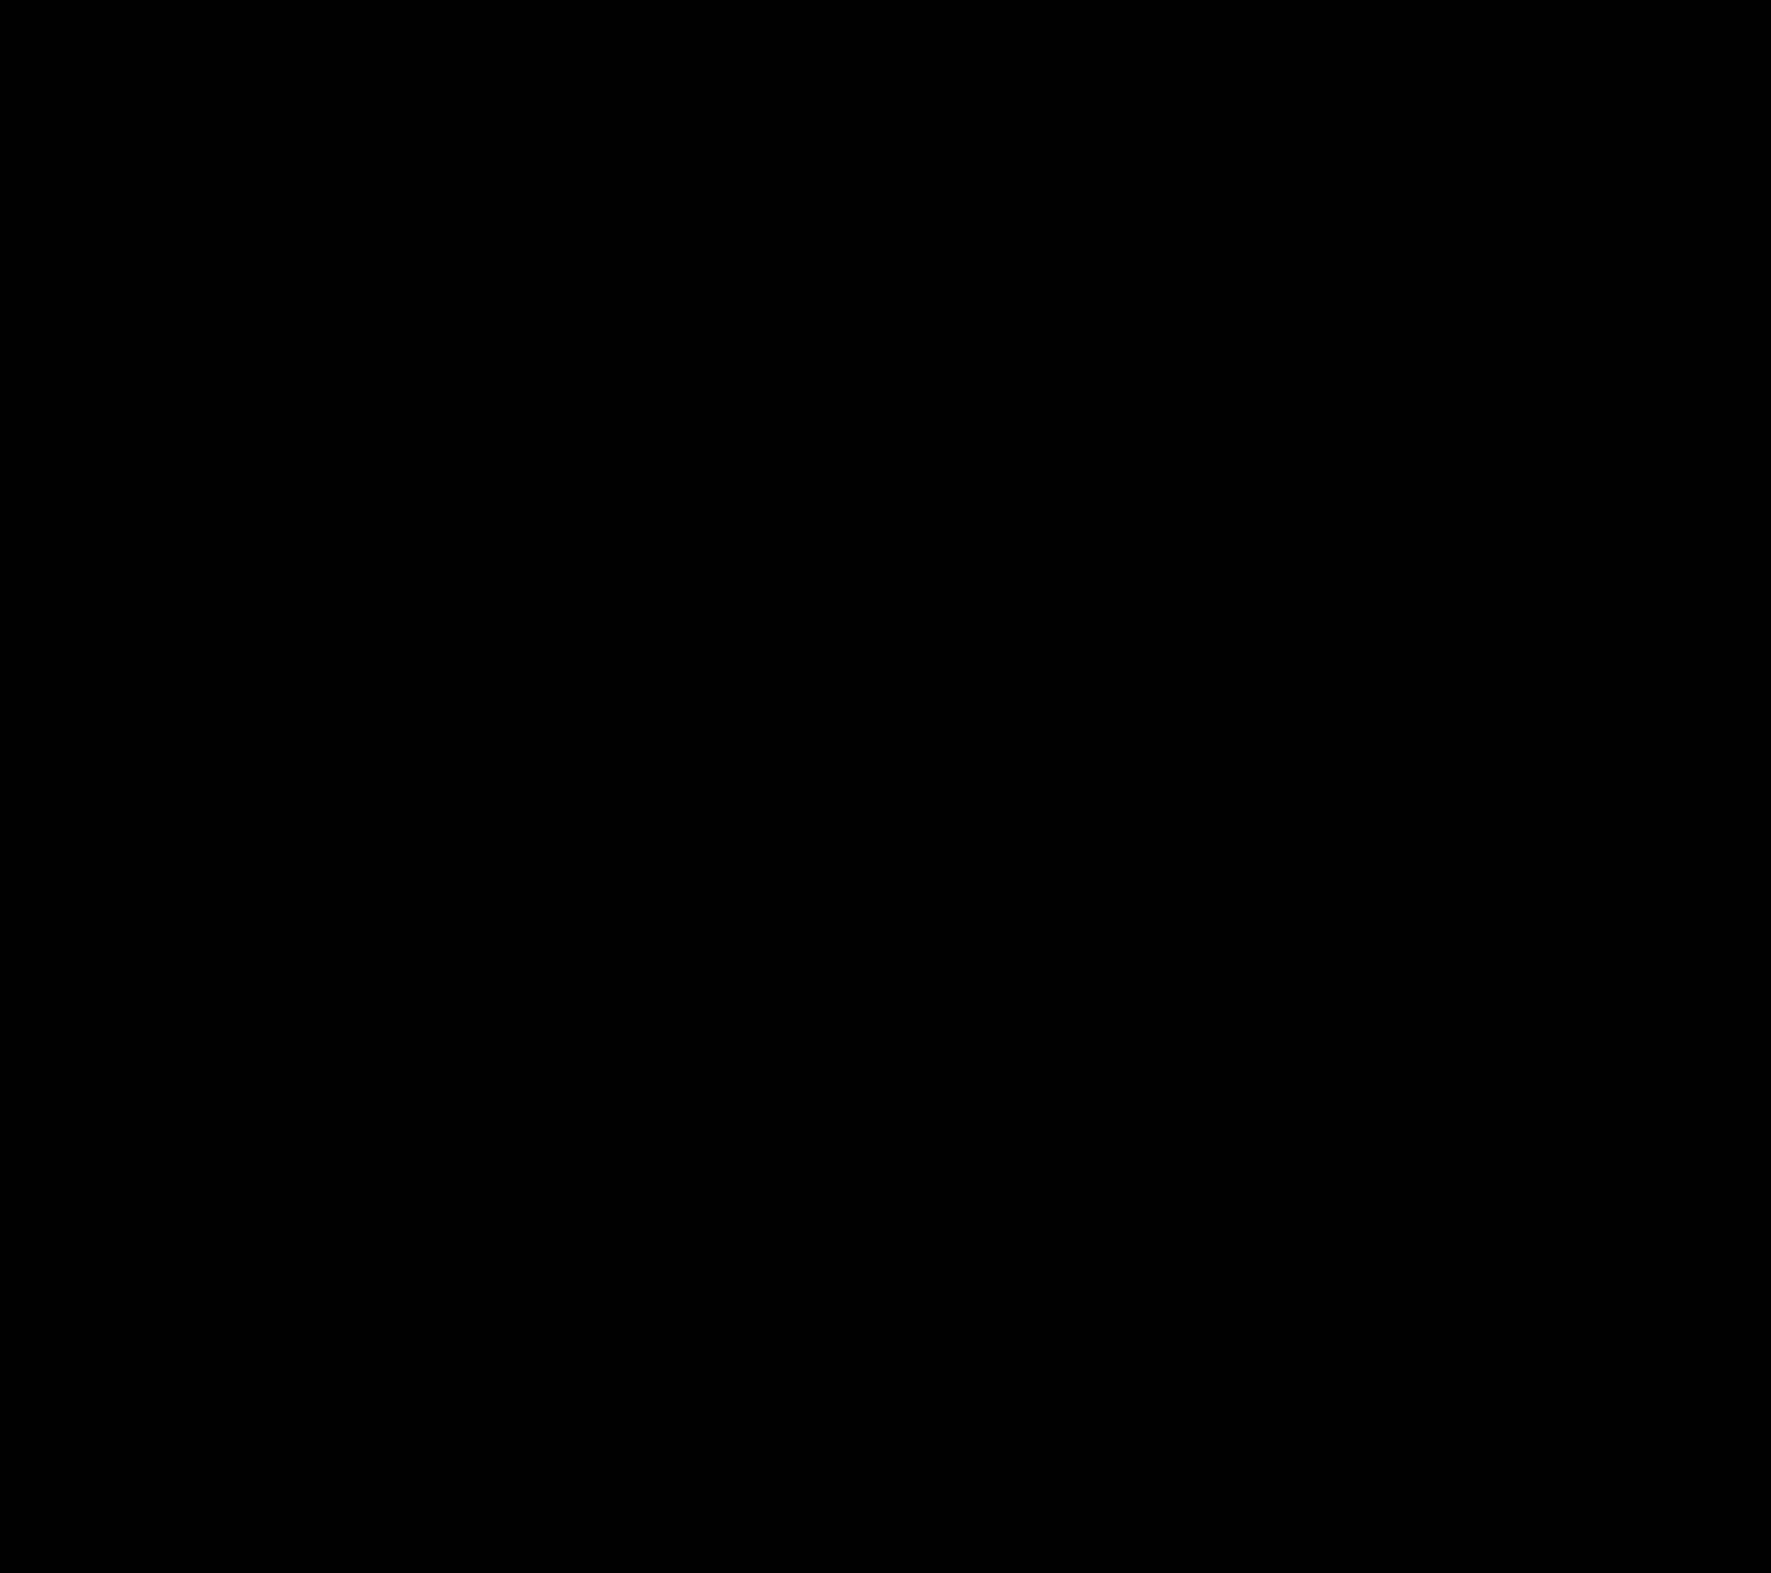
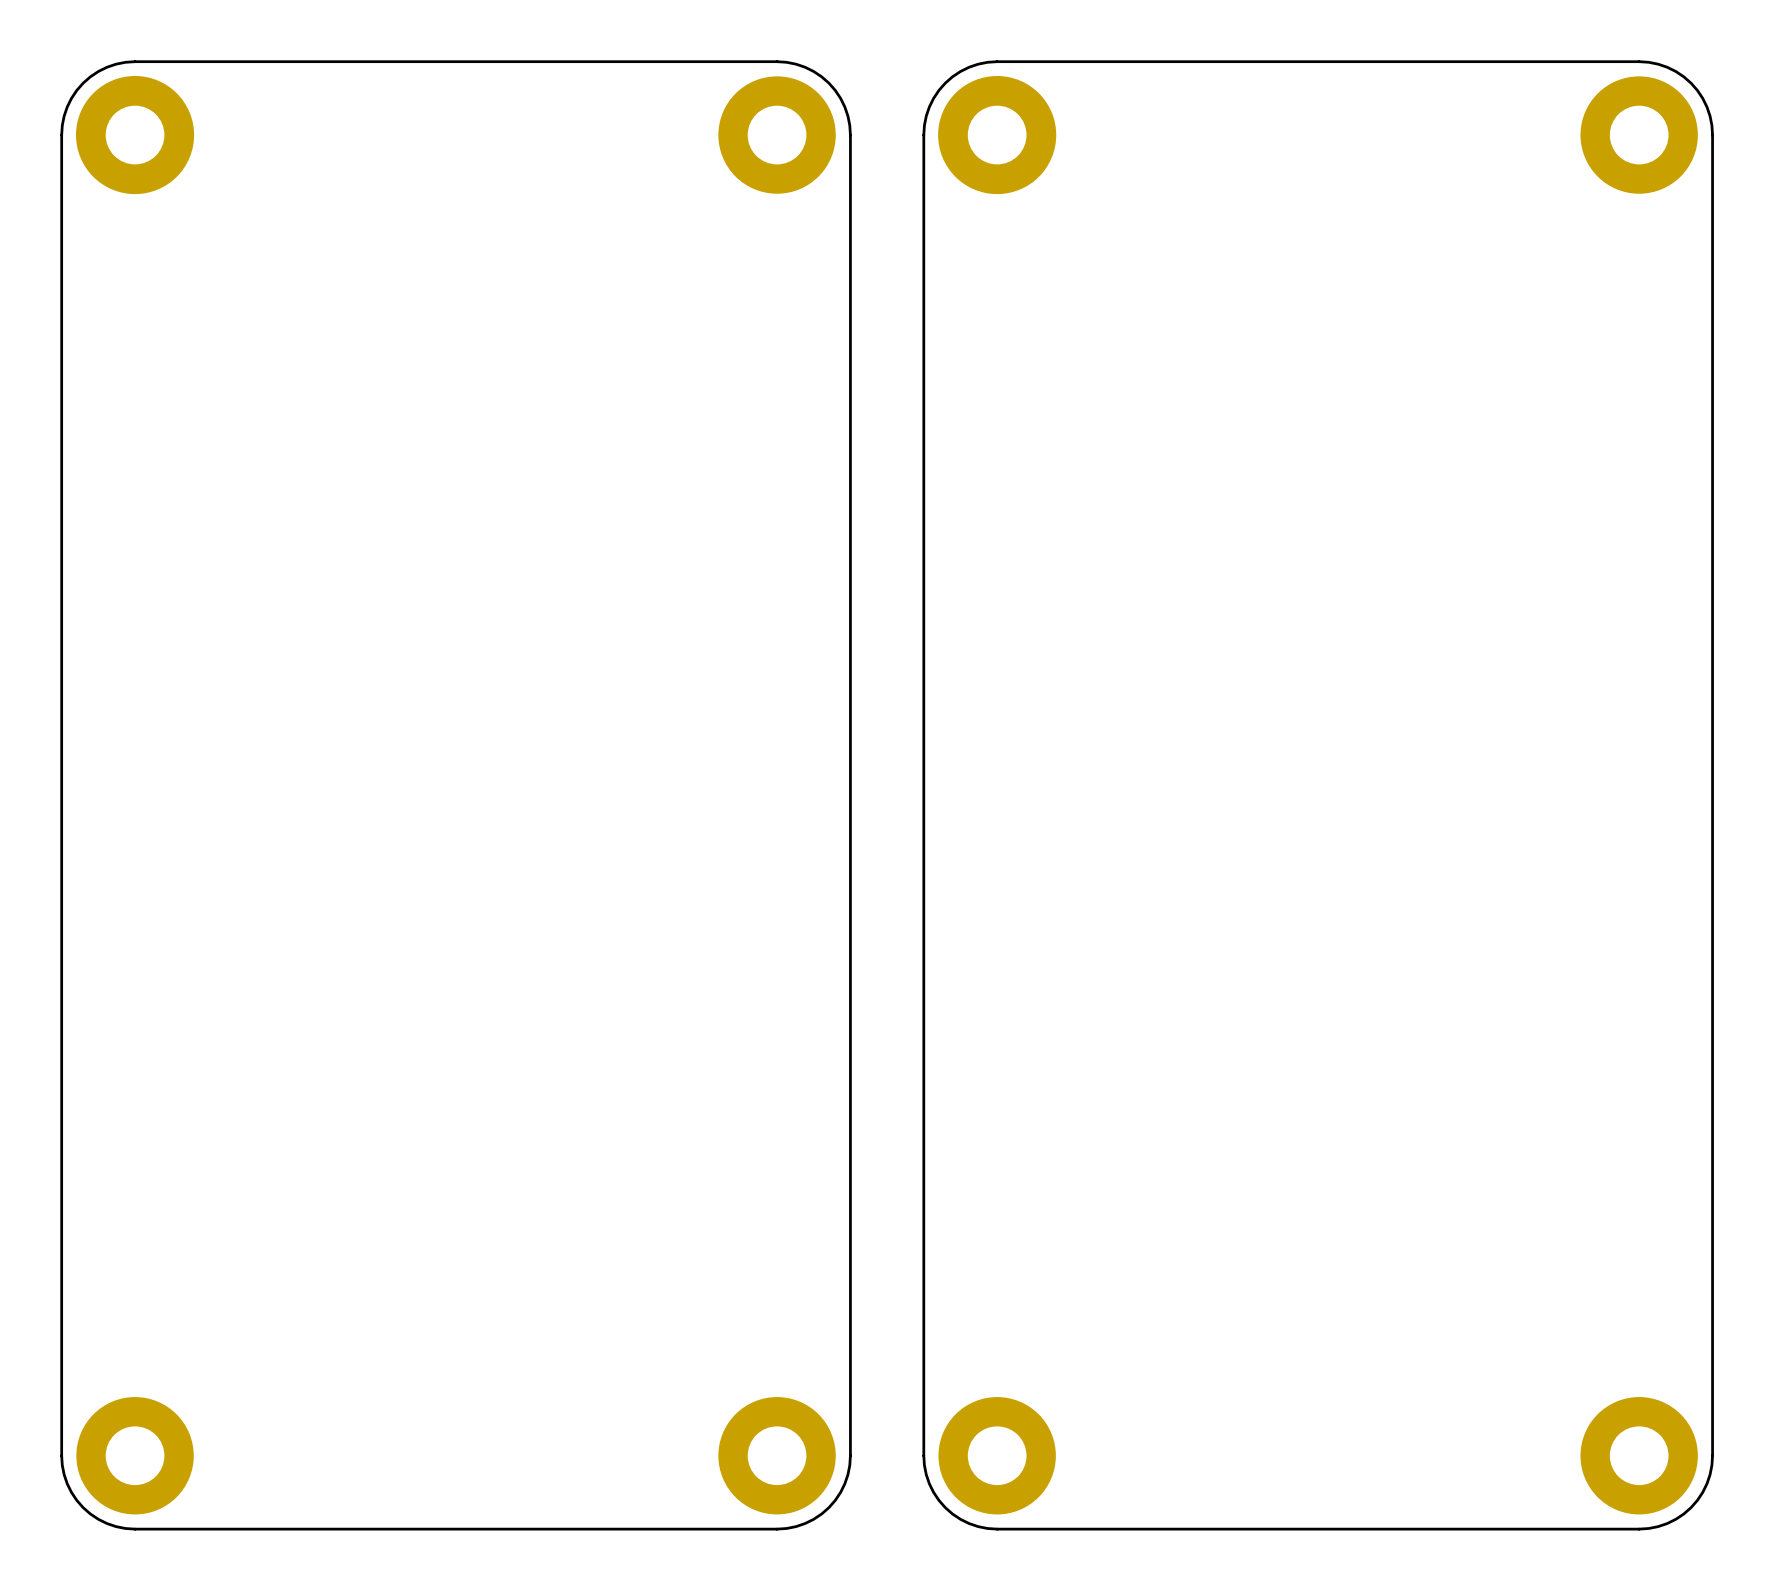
part: none -> (456, 795)
part: none -> (1318, 795)

